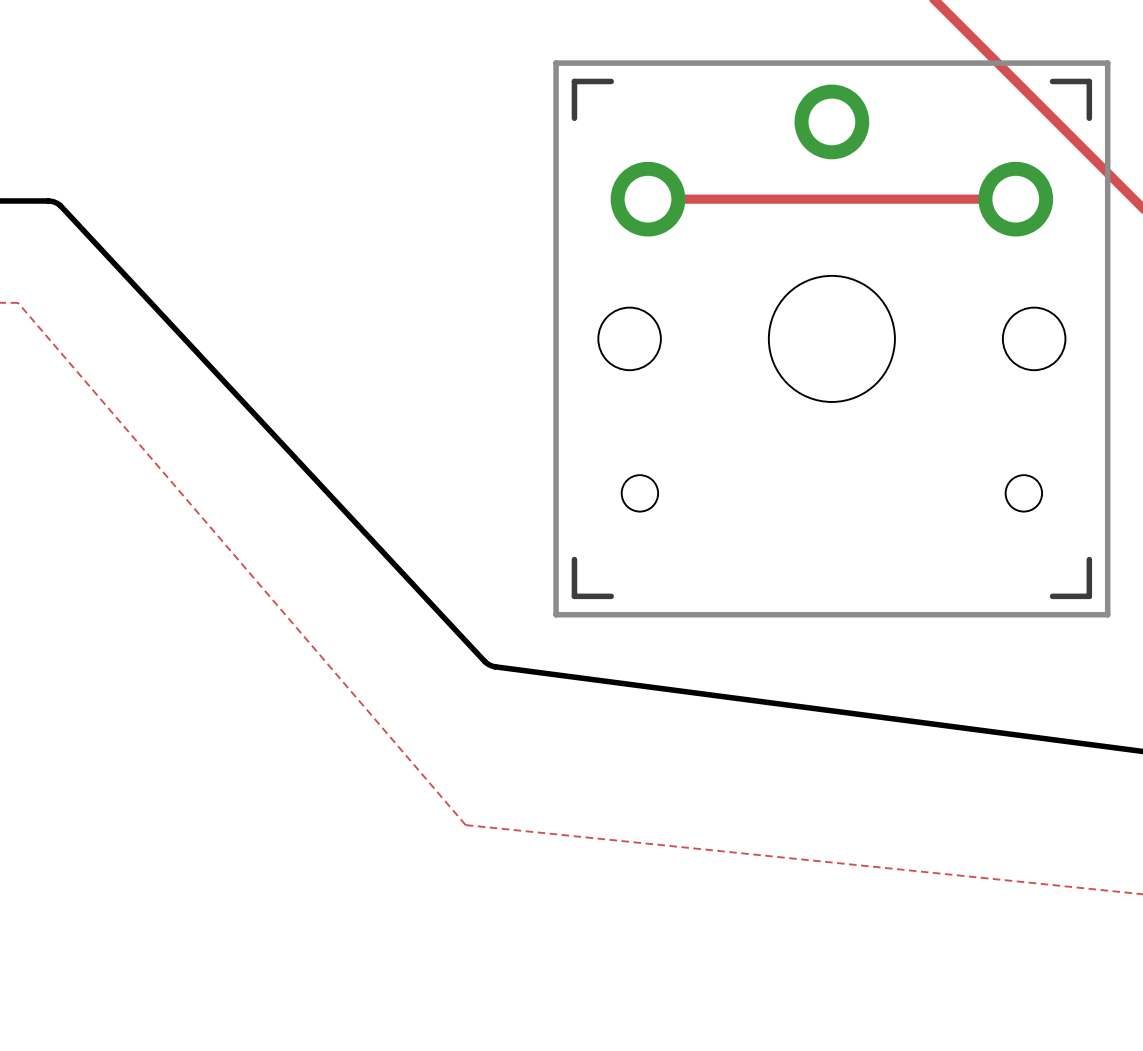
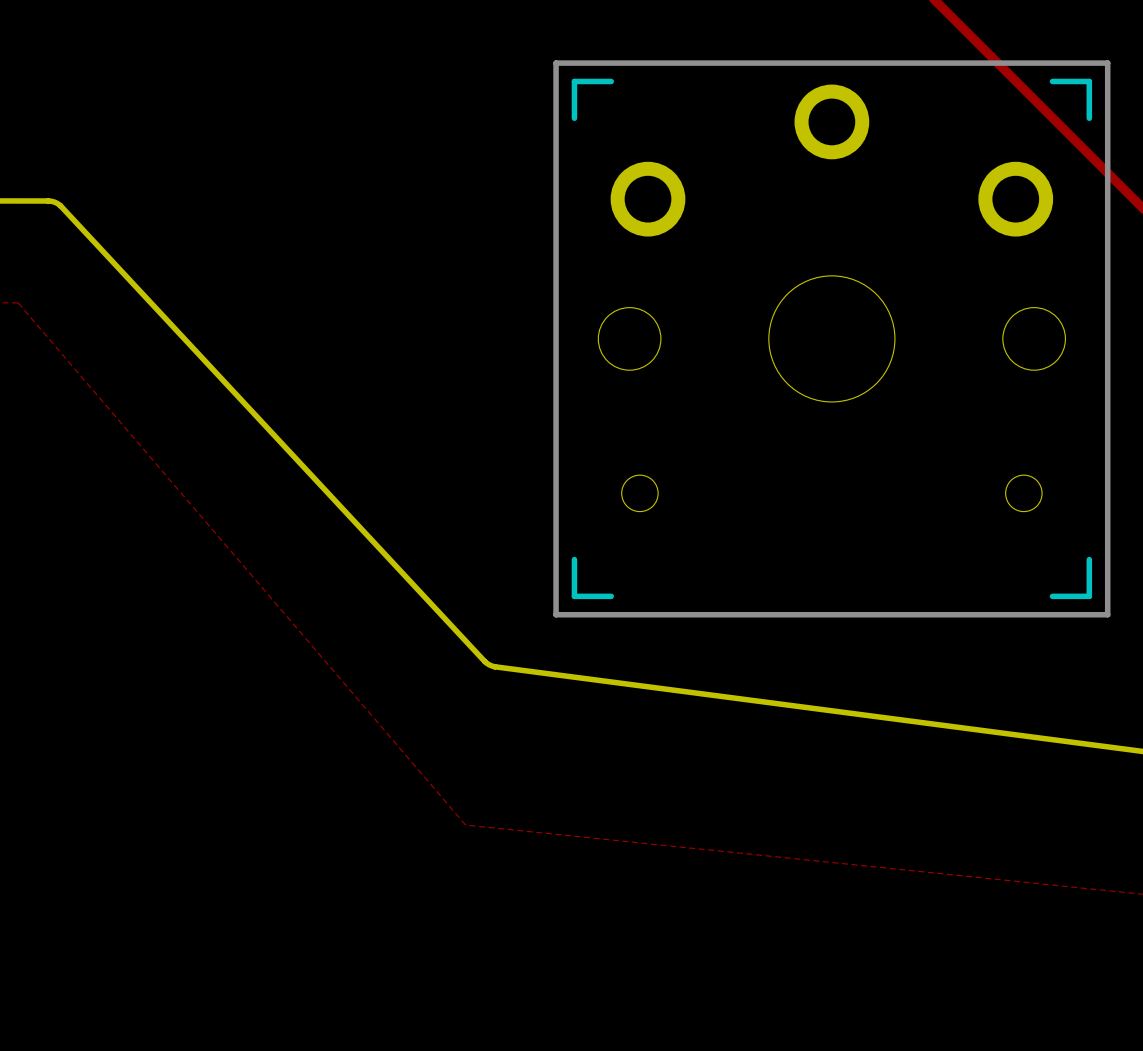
track: (648, 199) (1015, 199) -> none

